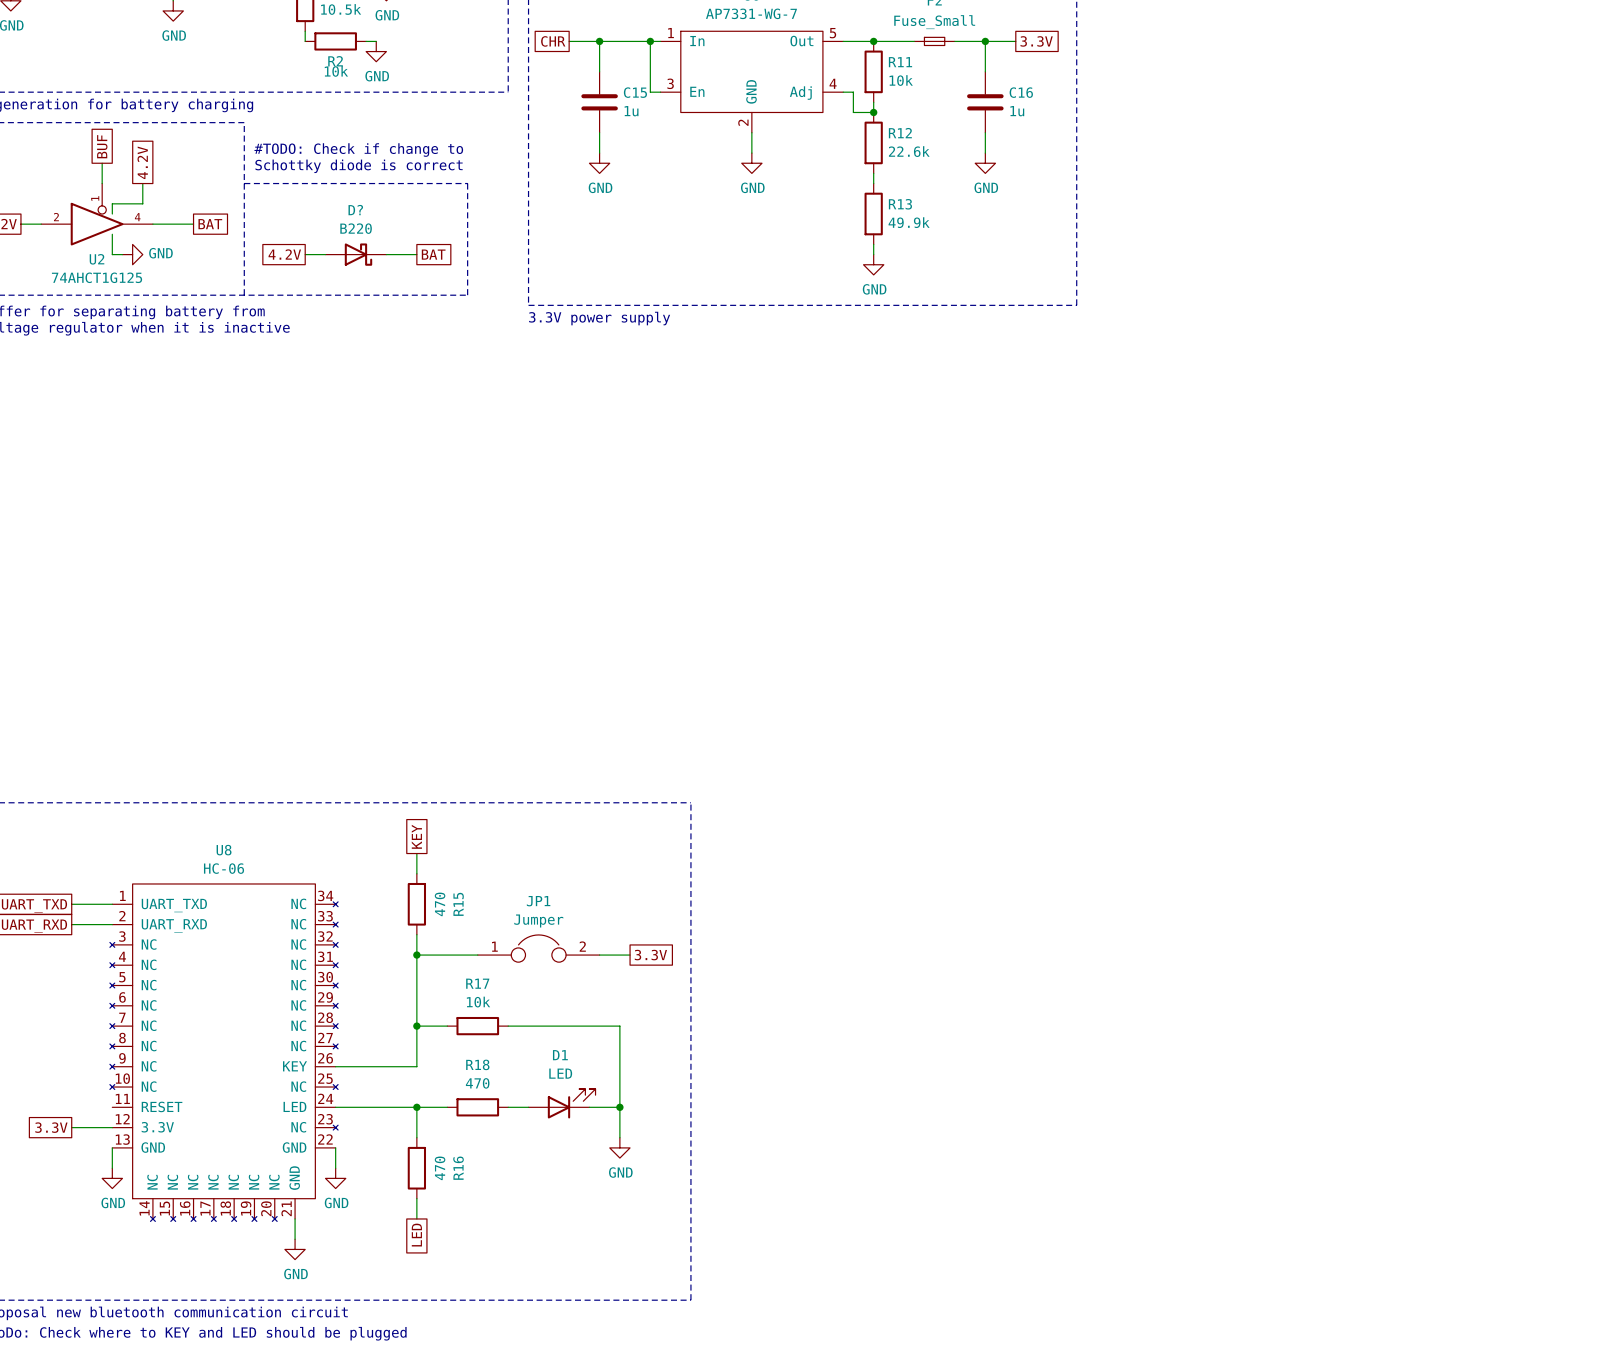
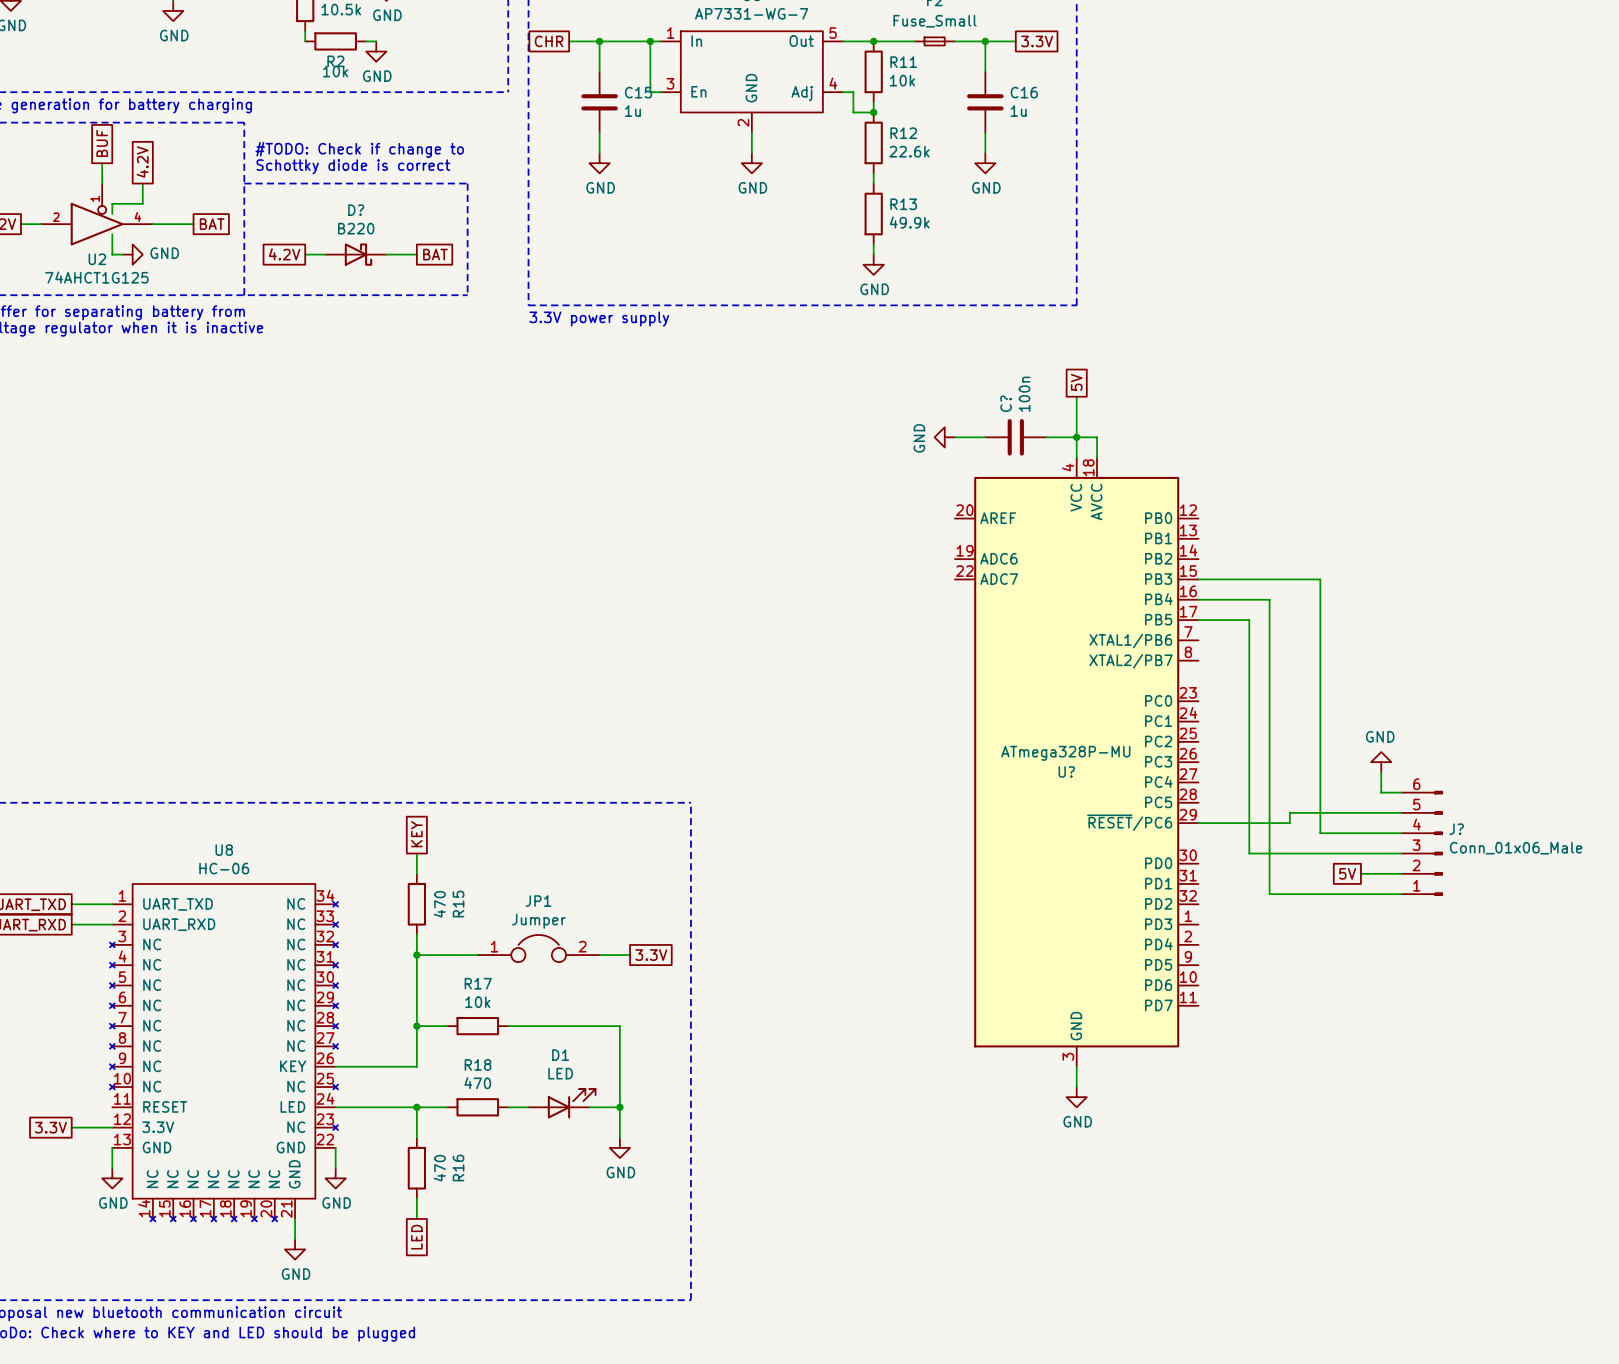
global label: none -> 5V (1076, 382)
wire: none -> (1076, 396) (1076, 457)
power symbol: none -> GND (944, 437)
wire: none -> (954, 437) (985, 437)
C?: none -> 100n (1015, 437)
wire: none -> (1046, 437) (1097, 437) (1097, 457)
junction: none -> (1076, 437)
wire: none -> (1198, 579) (1320, 579) (1320, 833) (1401, 833)
wire: none -> (1198, 599) (1269, 599) (1269, 894) (1401, 894)
wire: none -> (1198, 620) (1249, 620) (1249, 853) (1401, 853)
U?: none -> ATmega328P-MU (1076, 762)
power symbol: none -> GND (1381, 762)
wire: none -> (1381, 772) (1381, 792) (1401, 792)
wire: none -> (1401, 812) (1289, 812) (1289, 823) (1198, 823)
J?: none -> Conn_01x06_Male (1422, 843)
global label: none -> 5V (1347, 873)
wire: none -> (1360, 873) (1401, 873)
wire: none -> (1076, 1066) (1076, 1087)
power symbol: none -> GND (1076, 1097)

